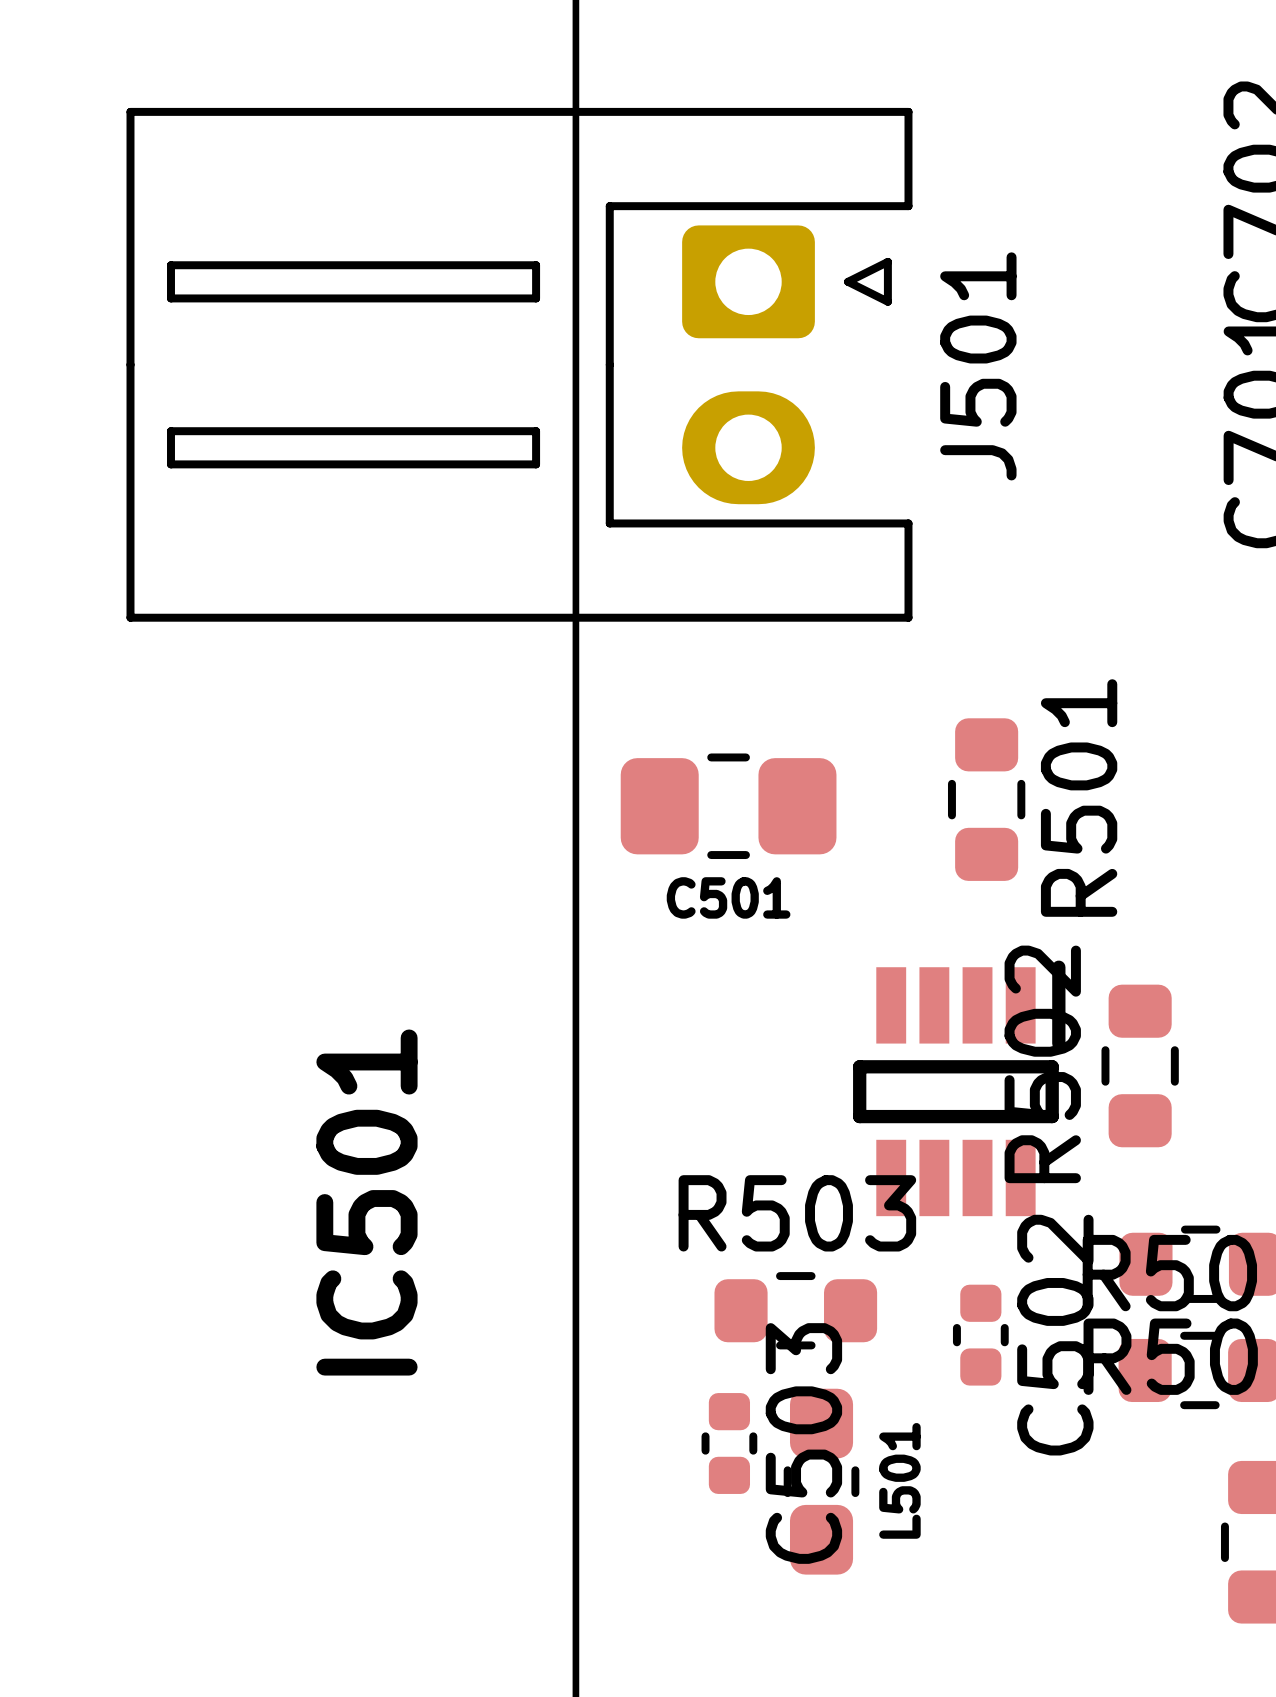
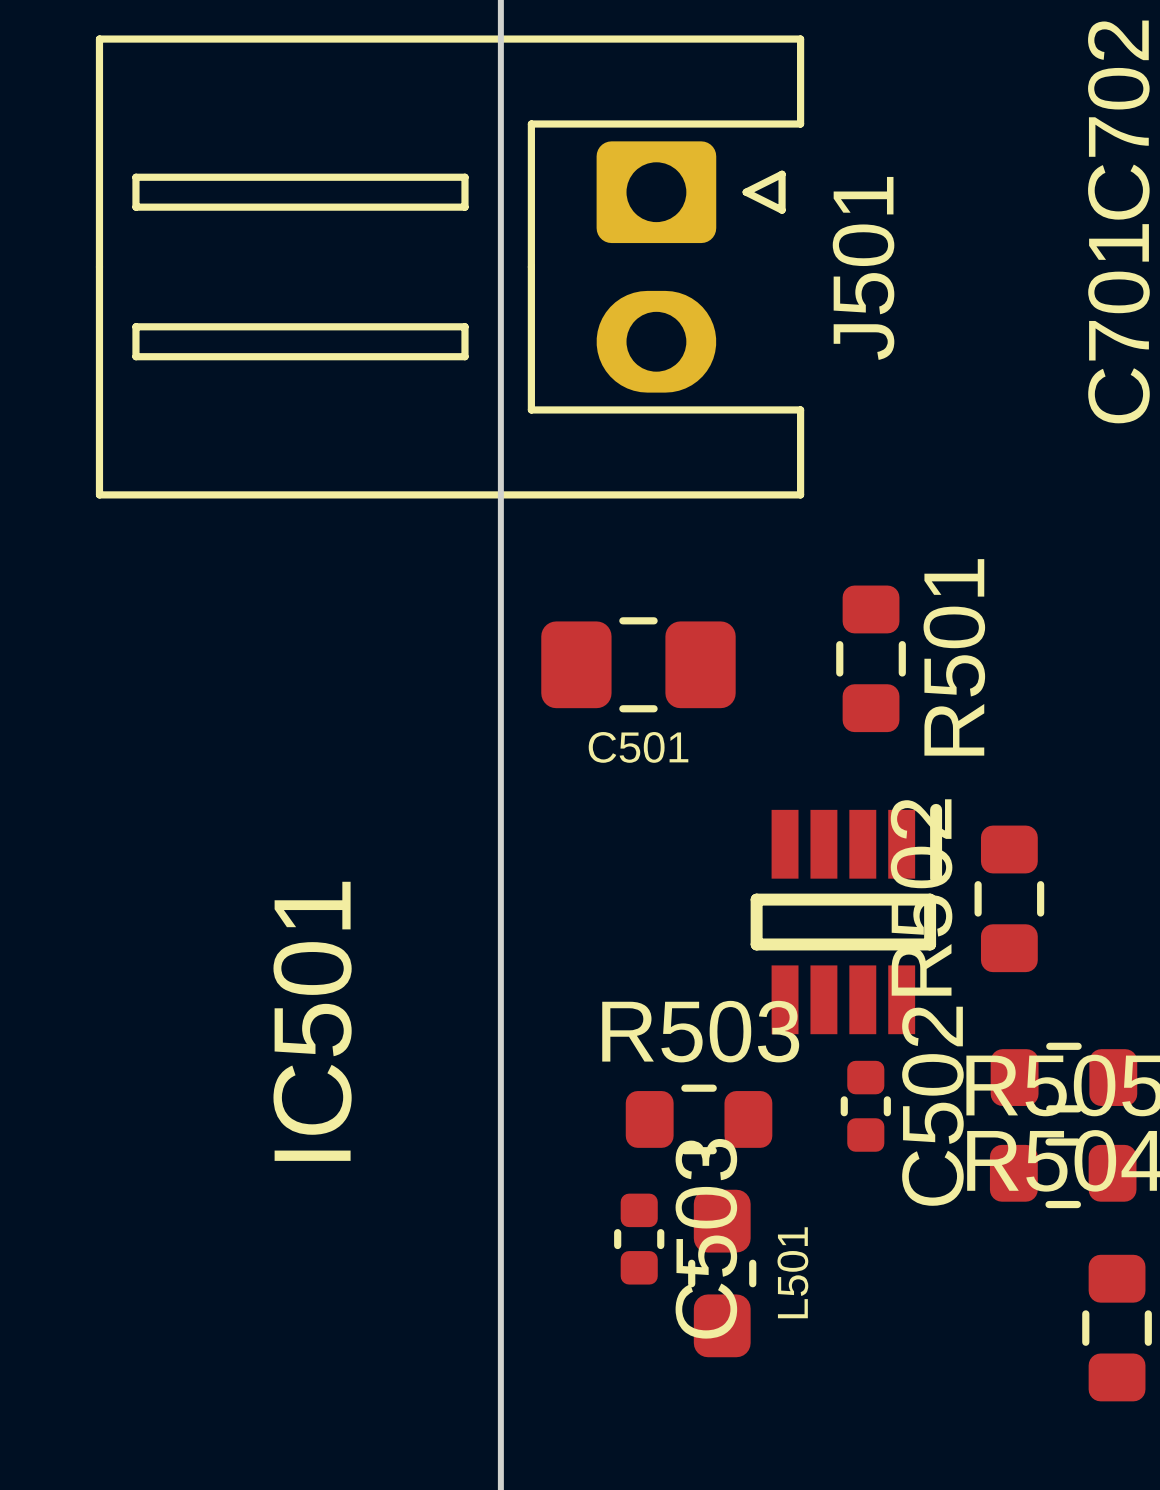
C502 position: (980, 1335) -> (865, 1106)

